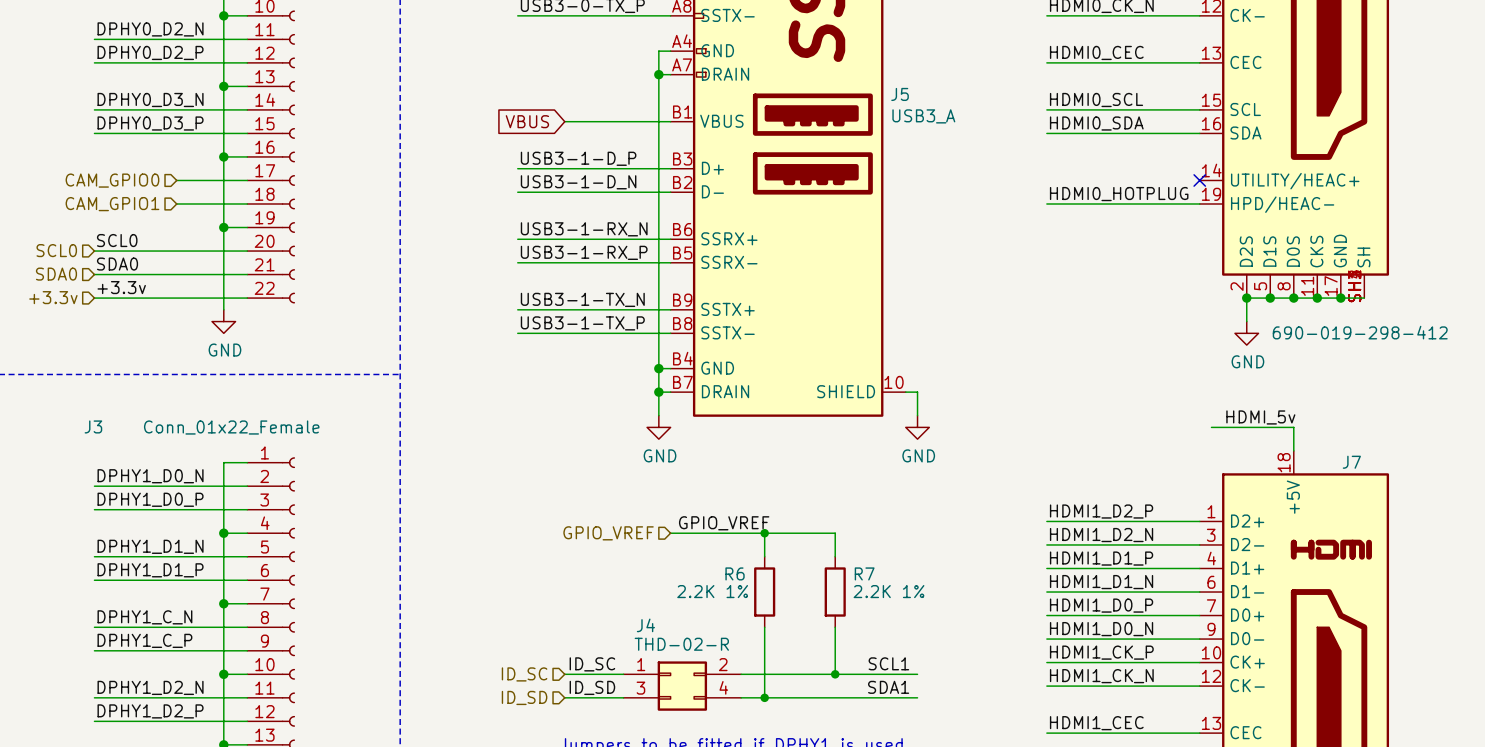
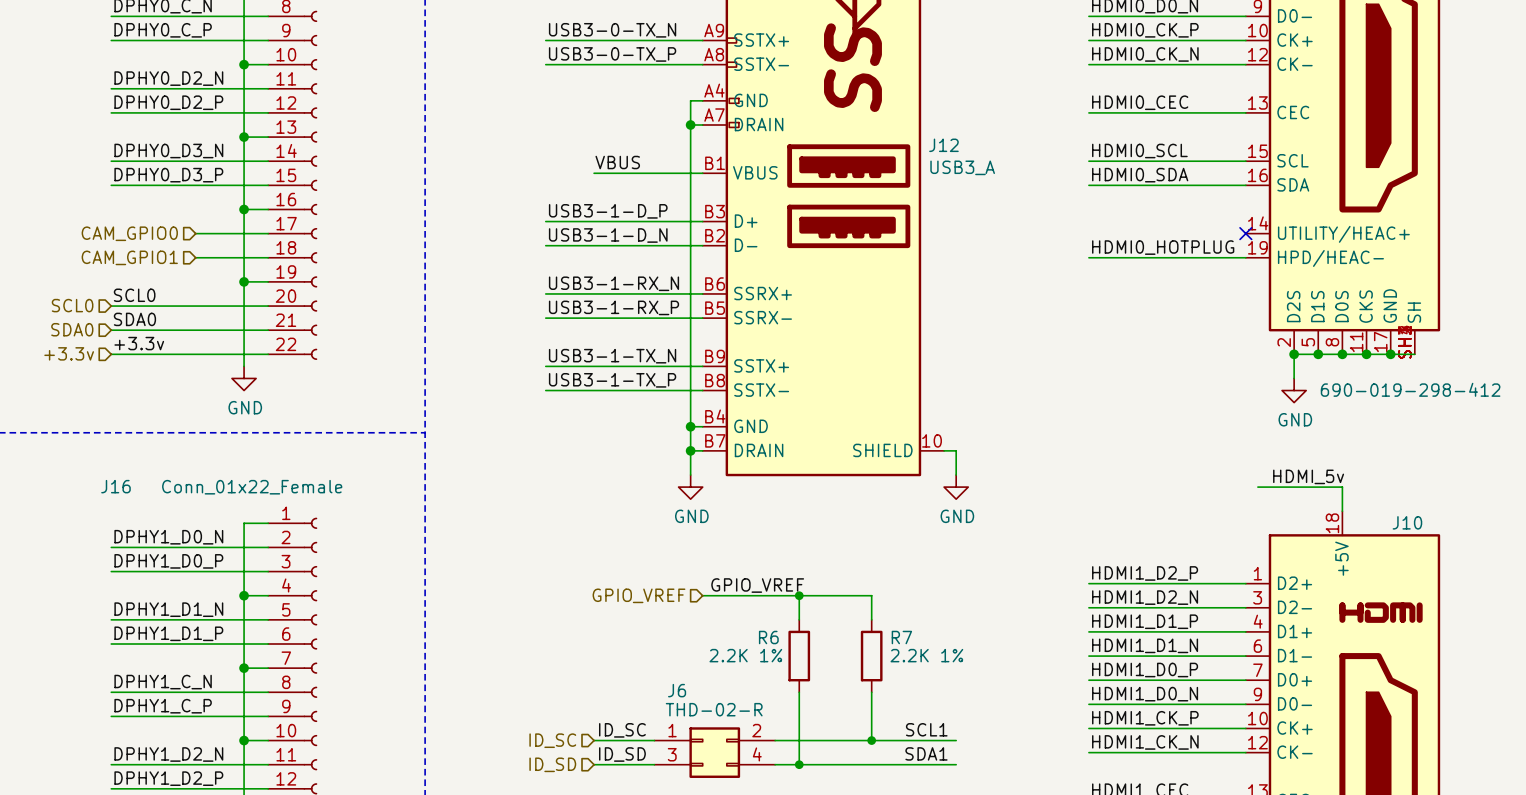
J5 name: J5 (900, 94) -> J12 (943, 145)
label: none -> VBUS (617, 162)
global label: VBUS (527, 121) -> none
J3 name: J3 (93, 426) -> J16 (115, 486)
J7 name: J7 (1351, 462) -> J10 (1407, 522)
J4 name: J4 (645, 625) -> J6 (677, 690)

